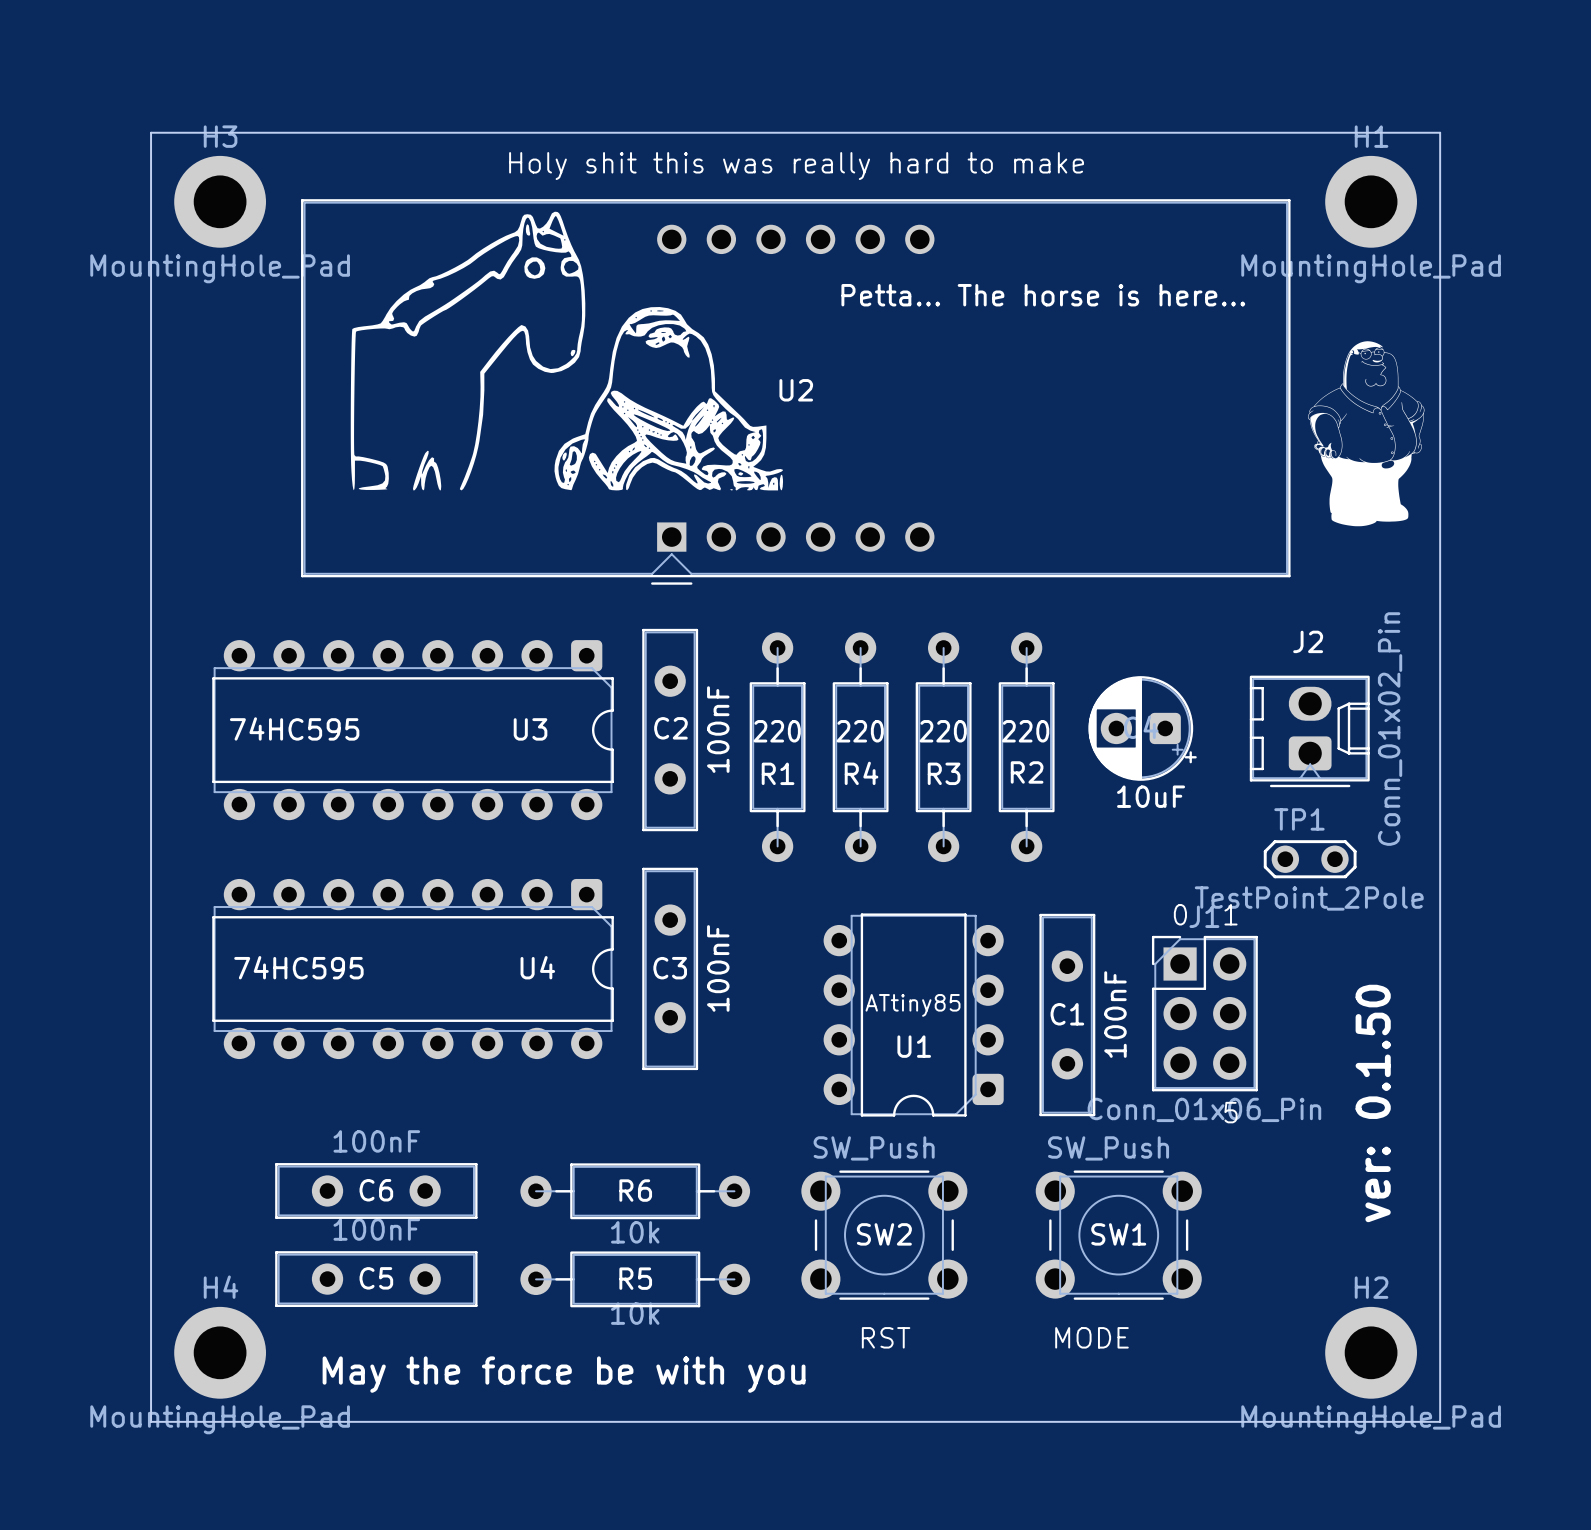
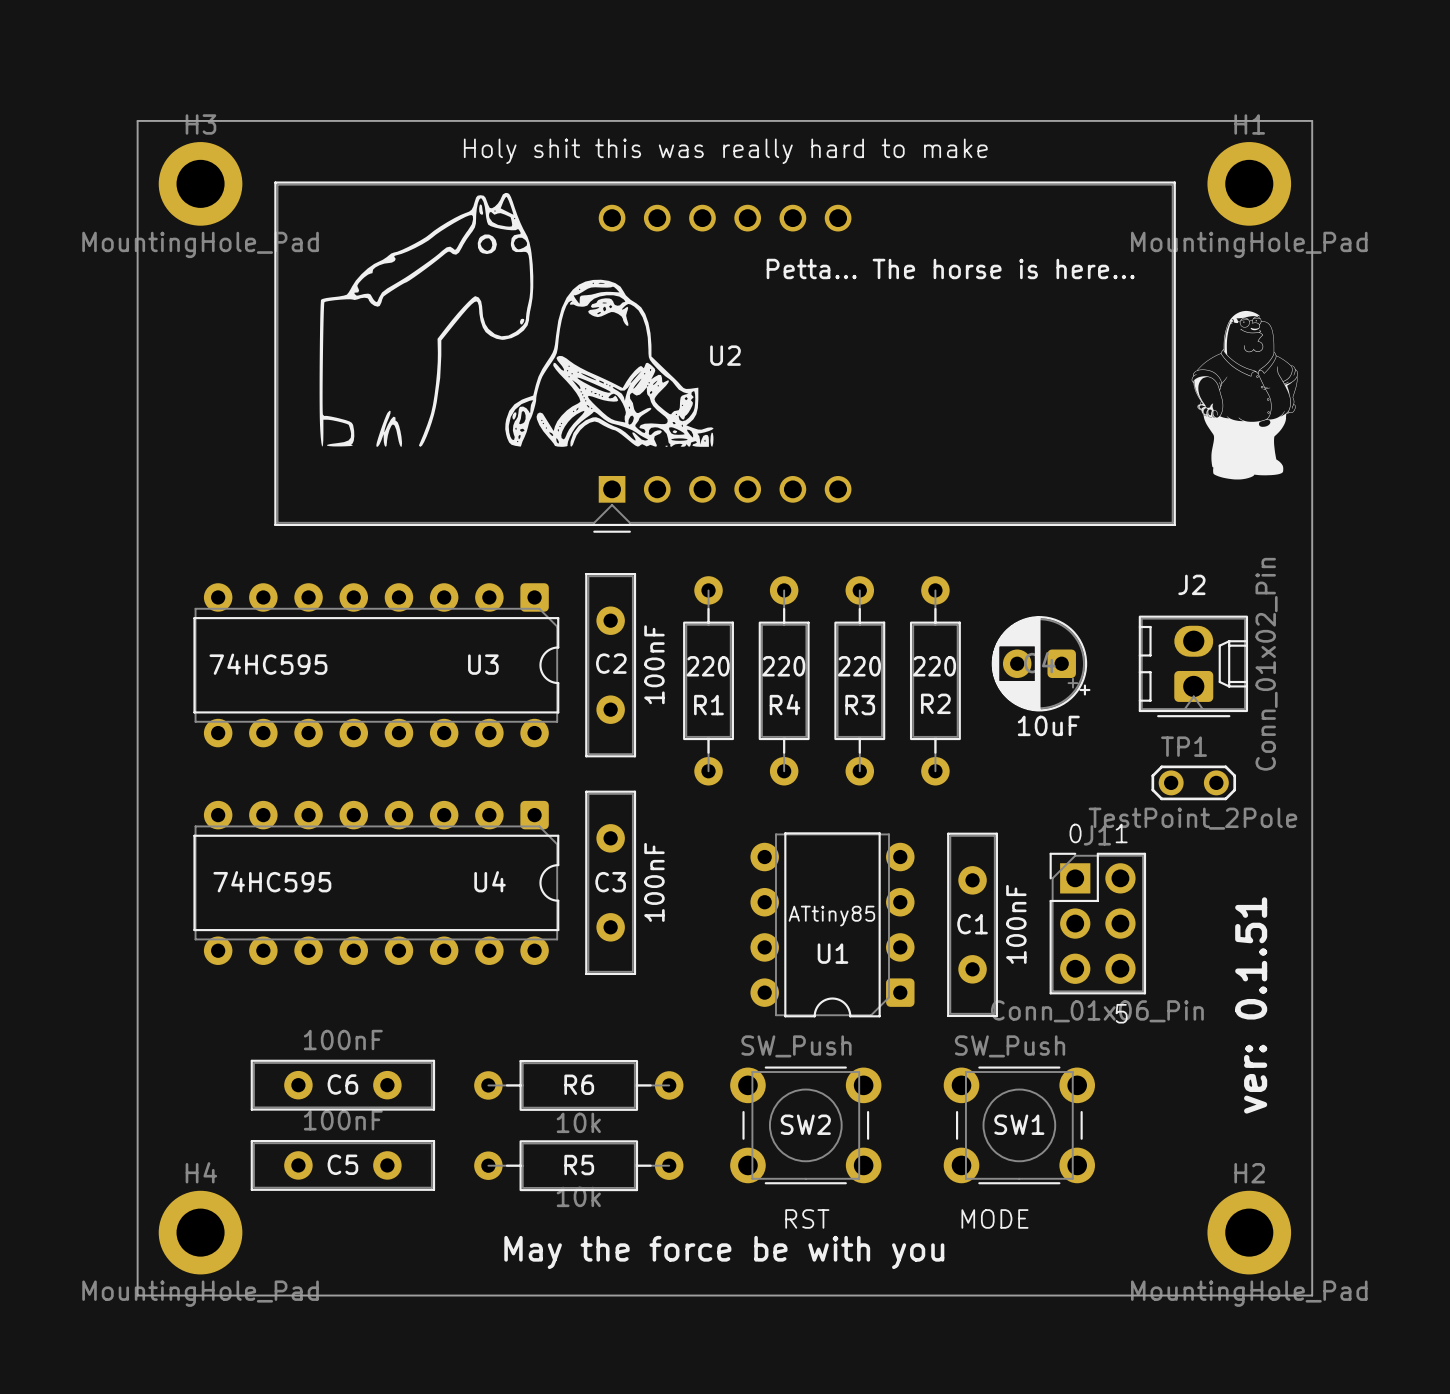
text: ver: 0.1.50 (1373, 1103) -> ver: 0.1.51 (1251, 1005)
text position: May the force be with you (564, 1374) -> May the force be with you (724, 1252)

